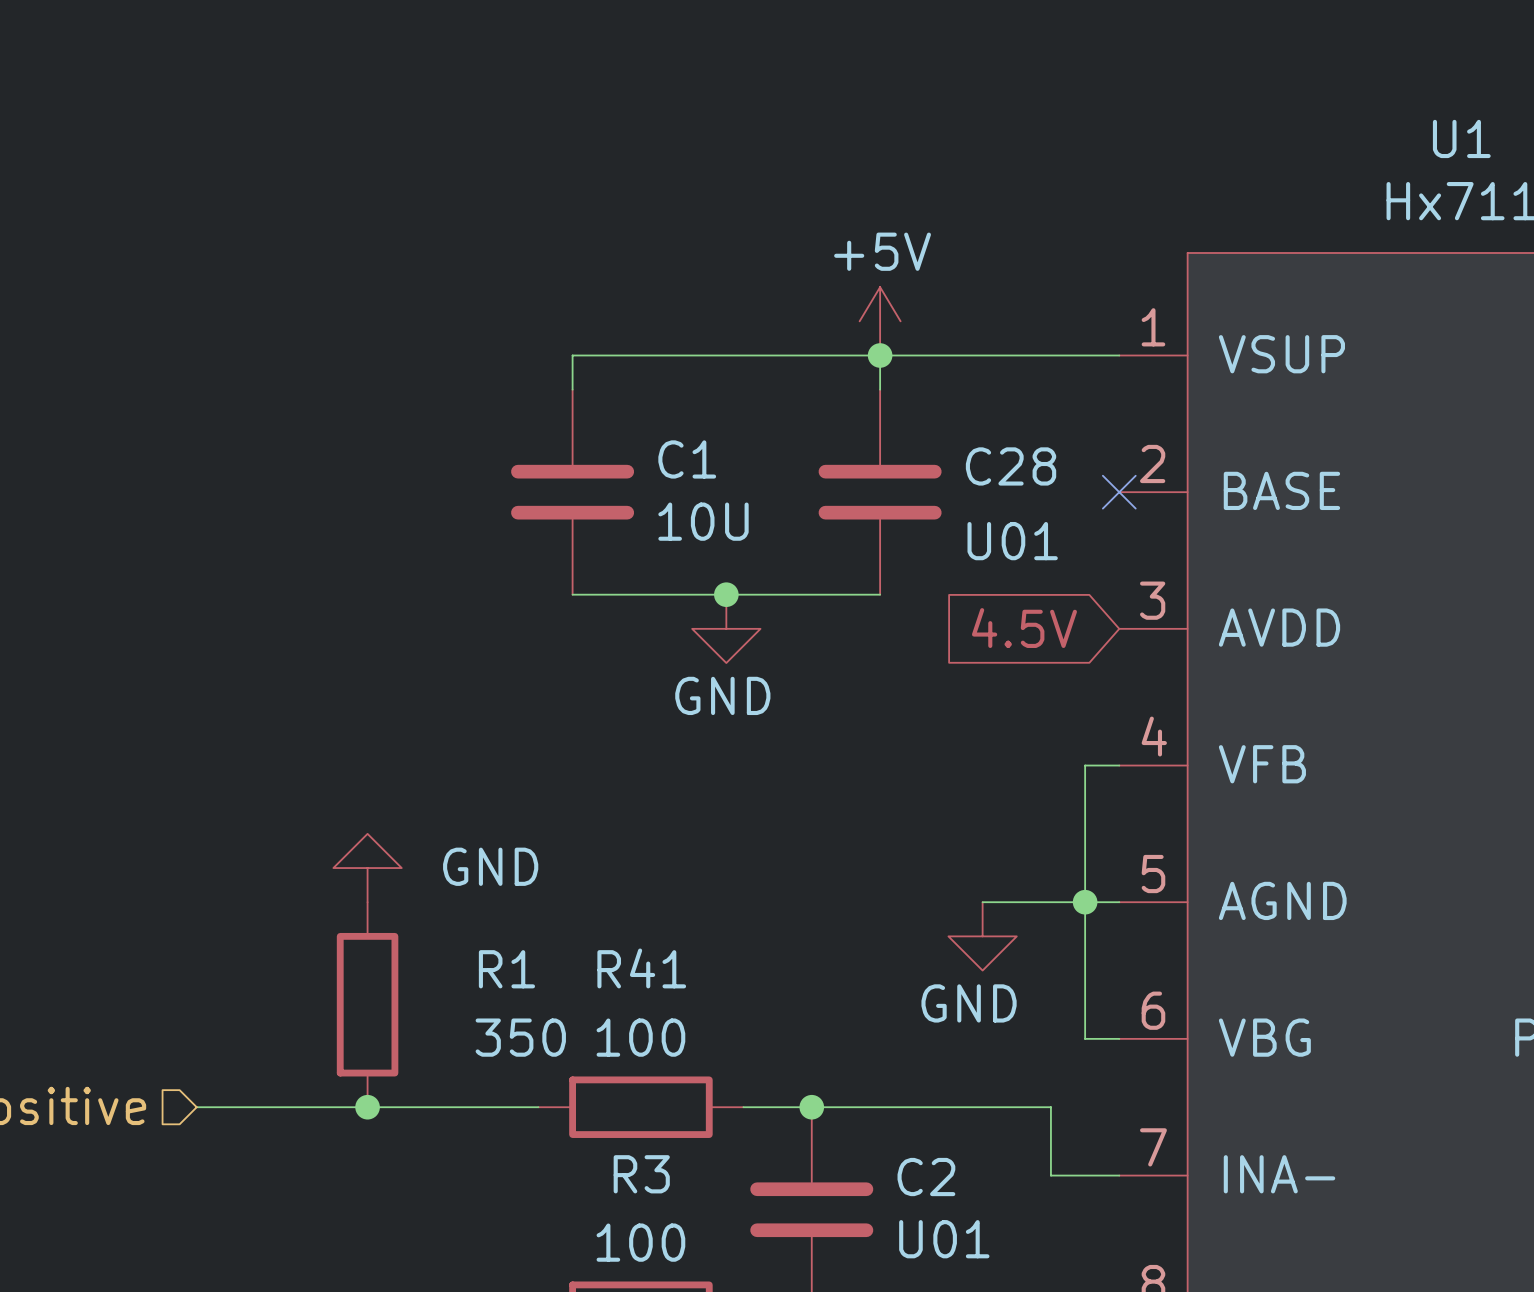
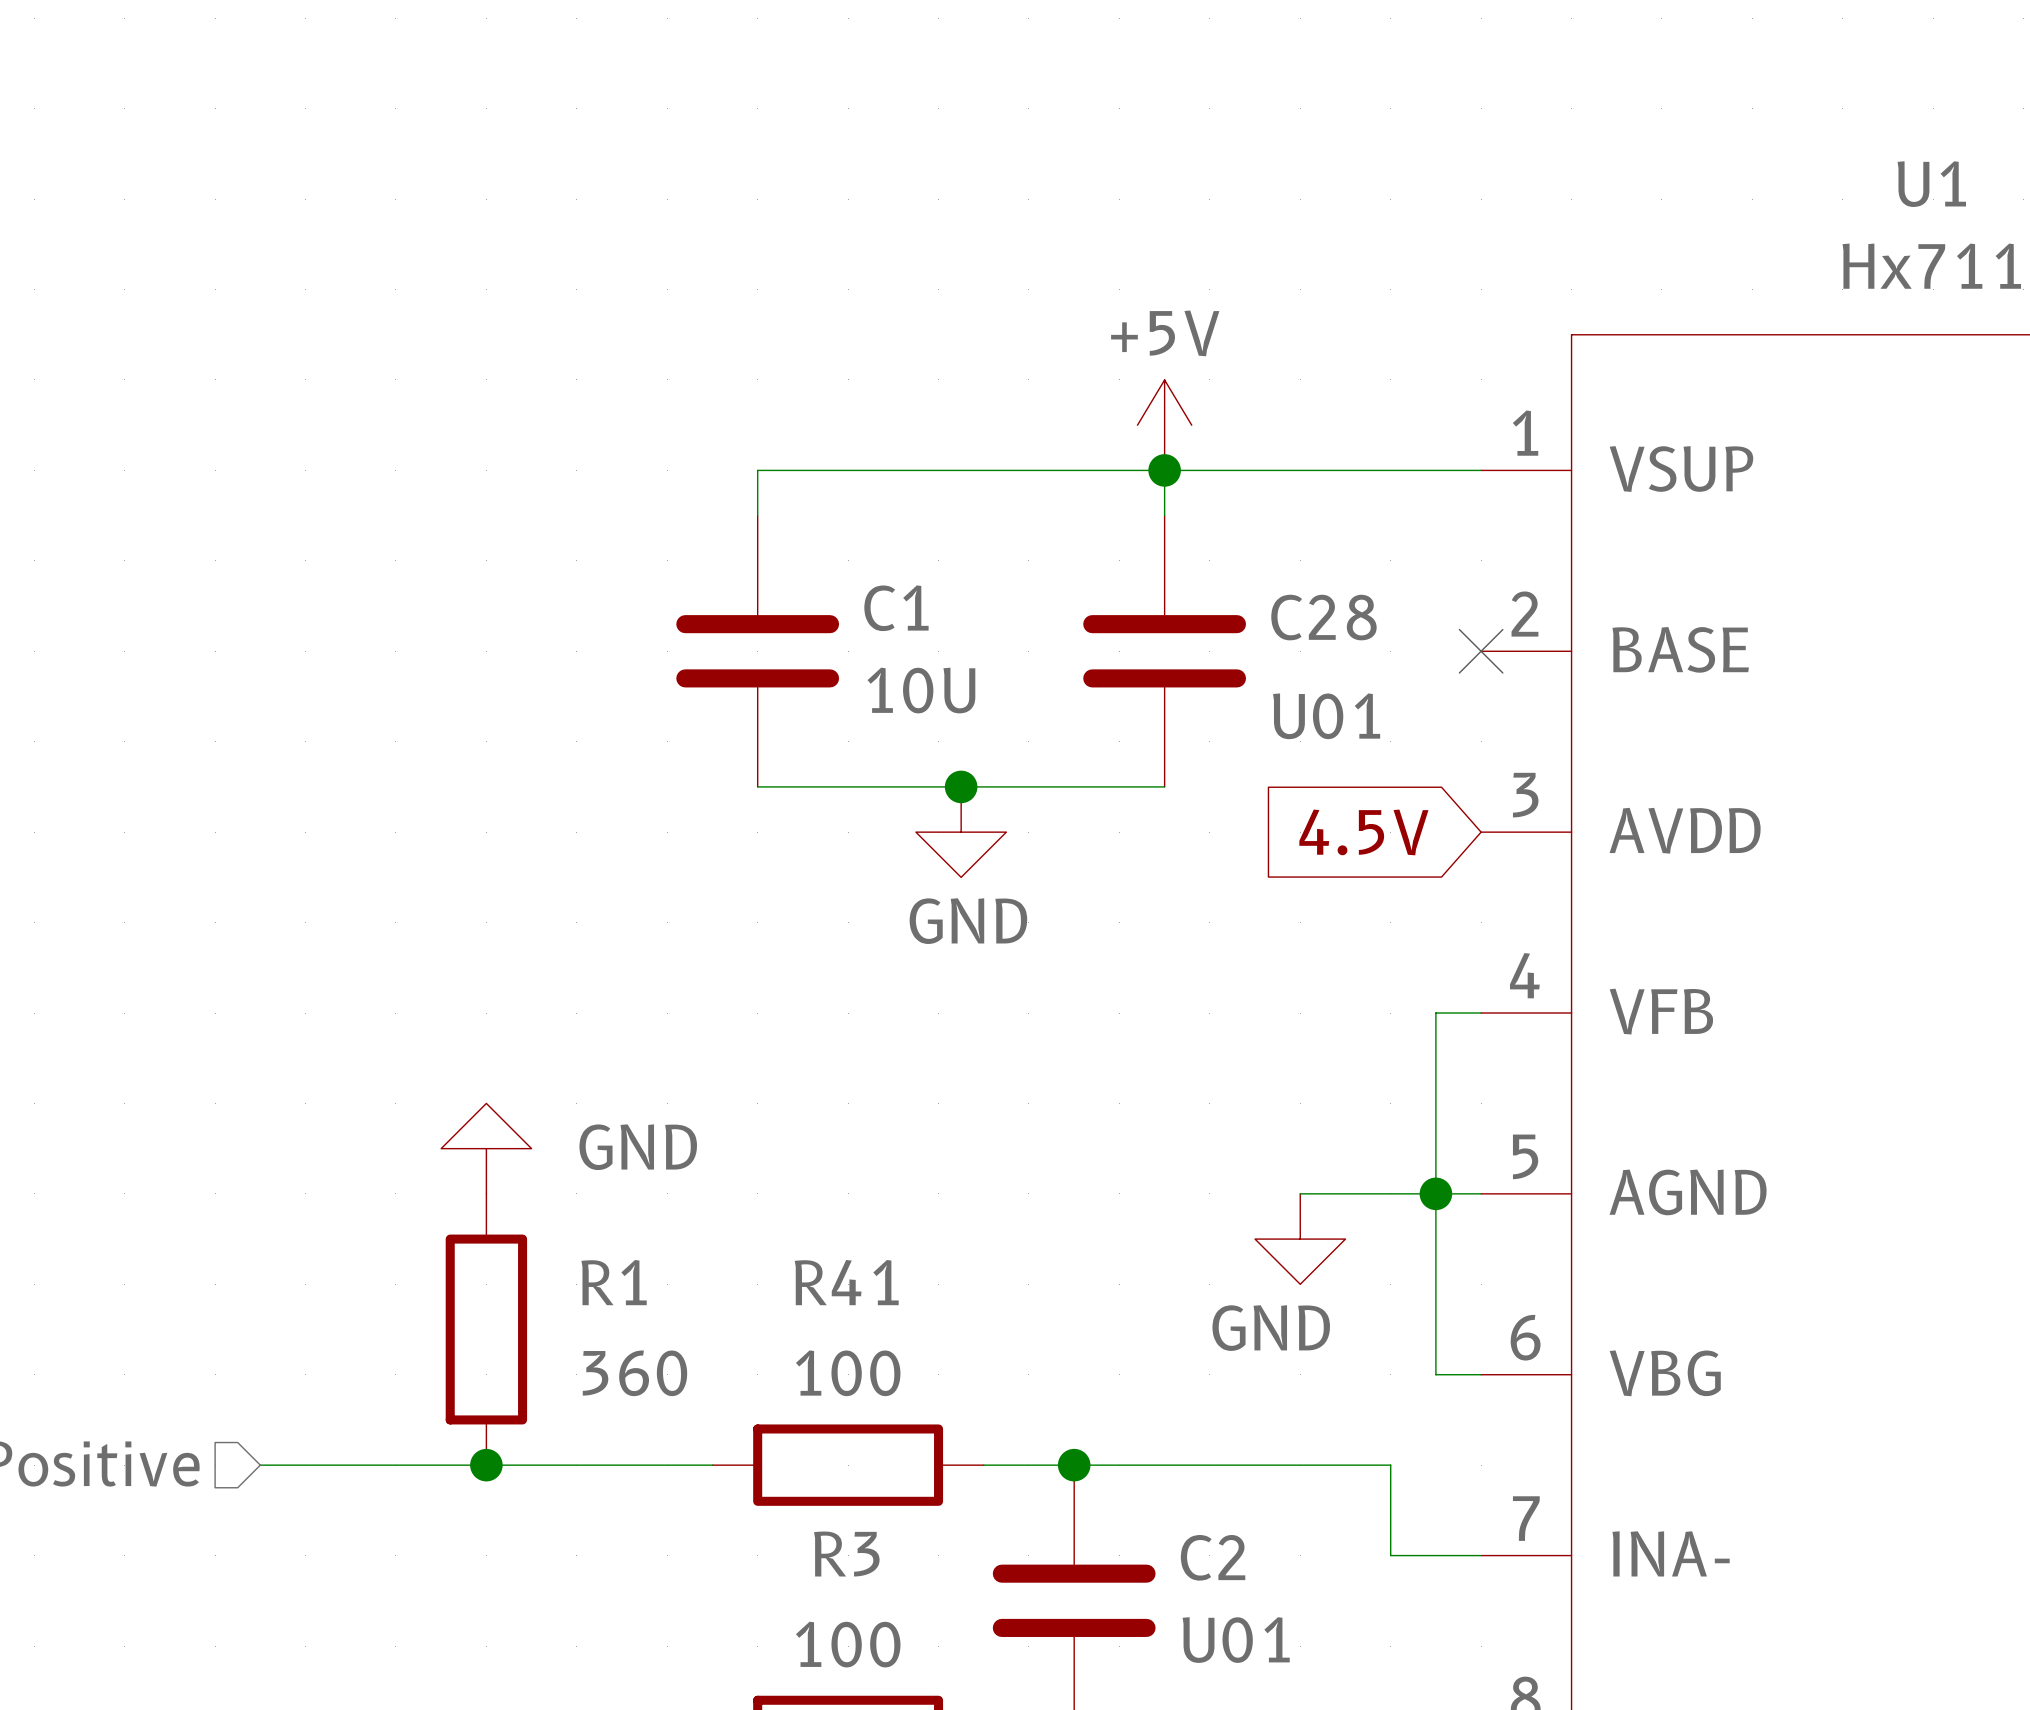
R1 name position: R1 (506, 969) -> R1 (614, 1282)
R1 value: 350 (520, 1037) -> 360 (634, 1373)

